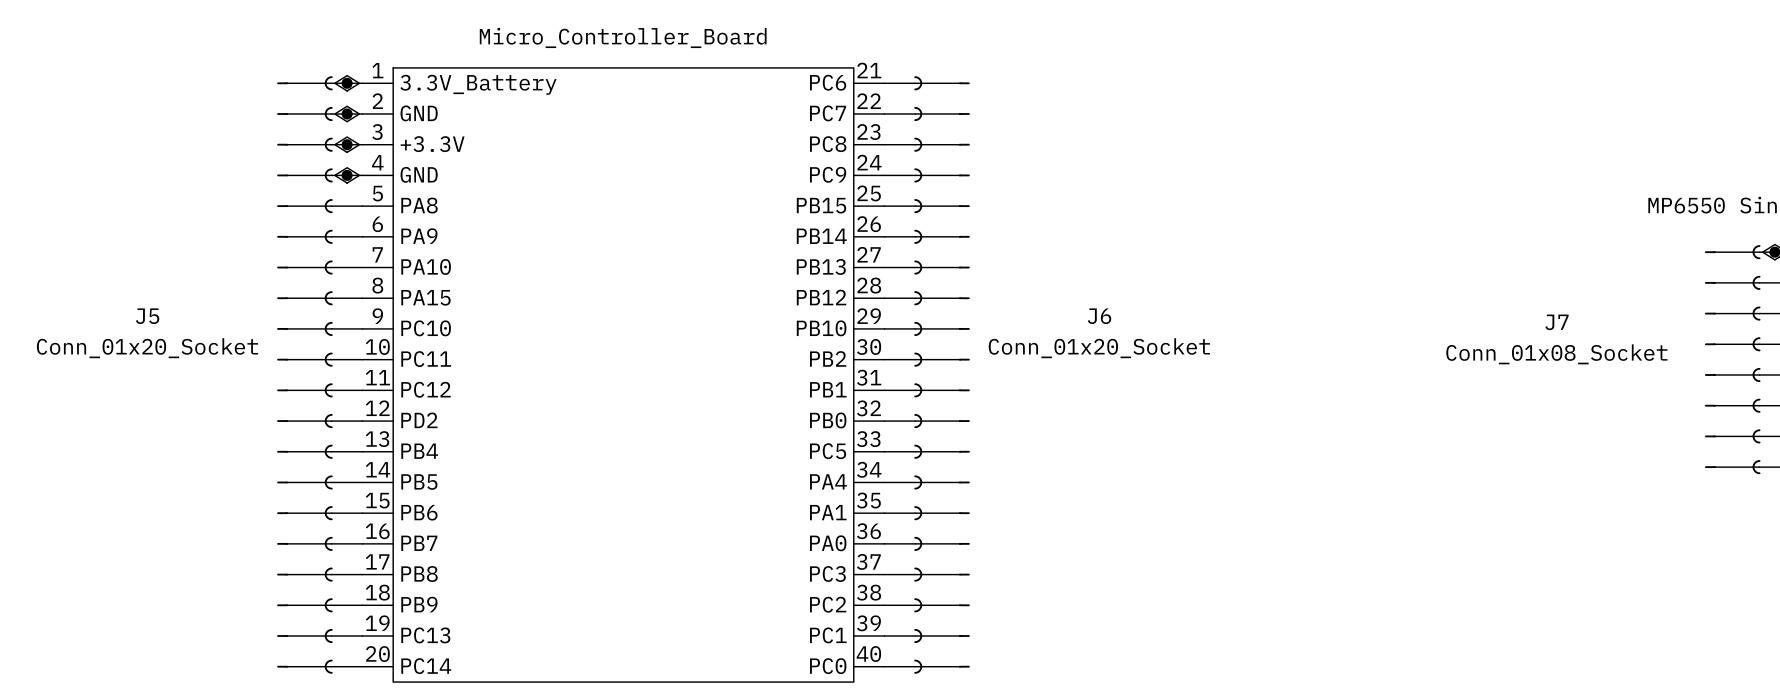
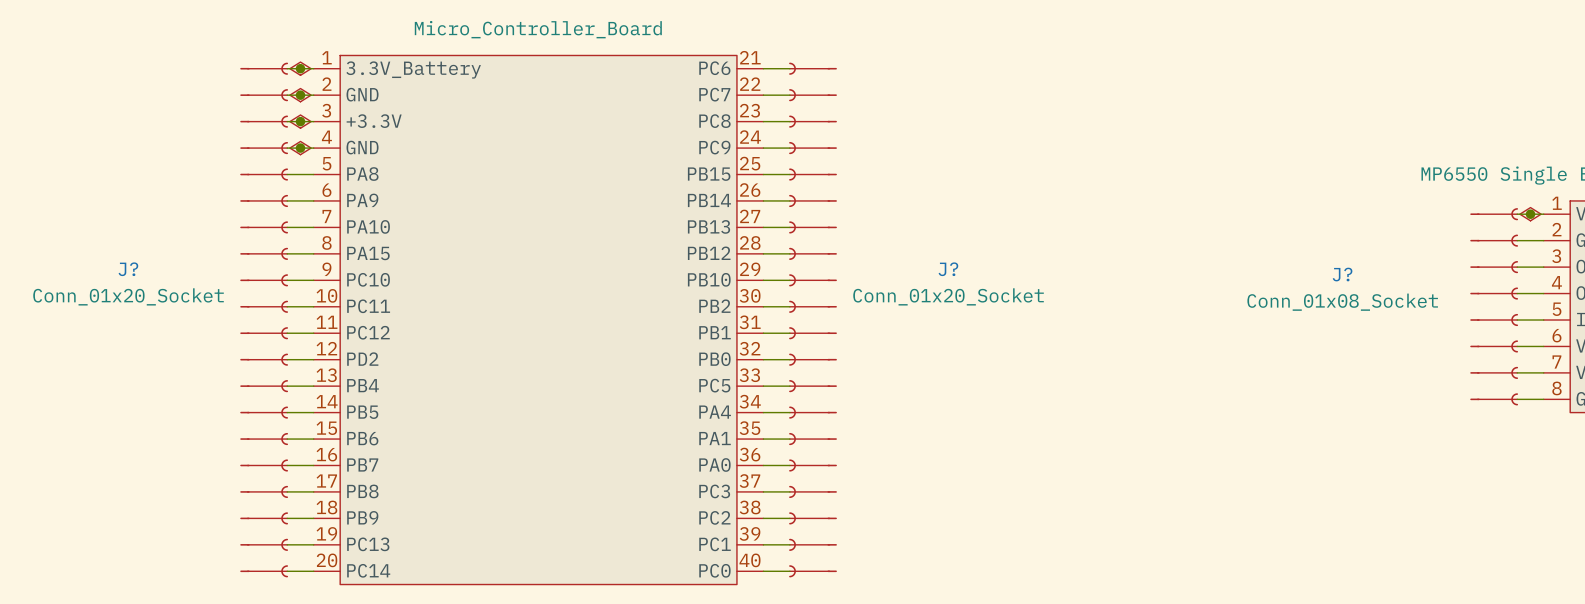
J5 name: J5 (147, 316) -> J? (128, 269)
J6 name: J6 (1099, 316) -> J? (948, 269)
J7 name: J7 (1556, 322) -> J? (1342, 274)

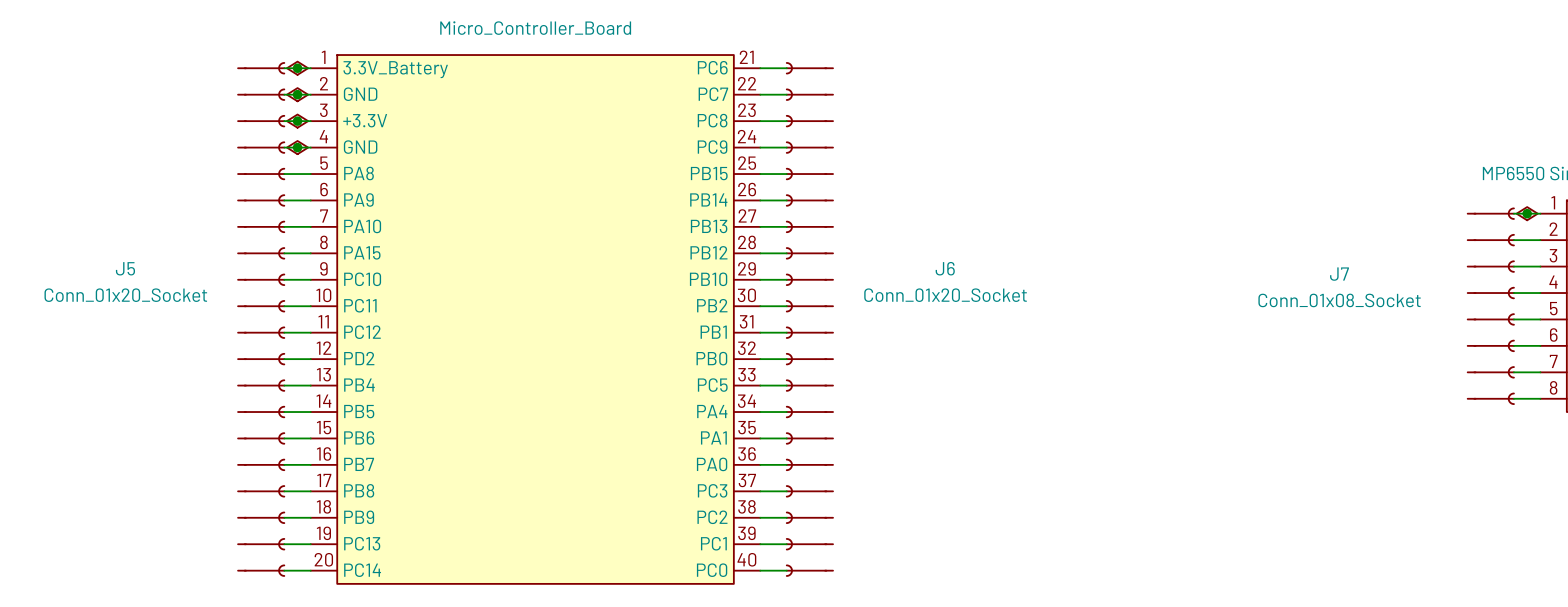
J? name: J? (128, 269) -> J5 (125, 268)
J? name: J? (948, 269) -> J6 (945, 268)
J? name: J? (1342, 274) -> J7 (1339, 274)

